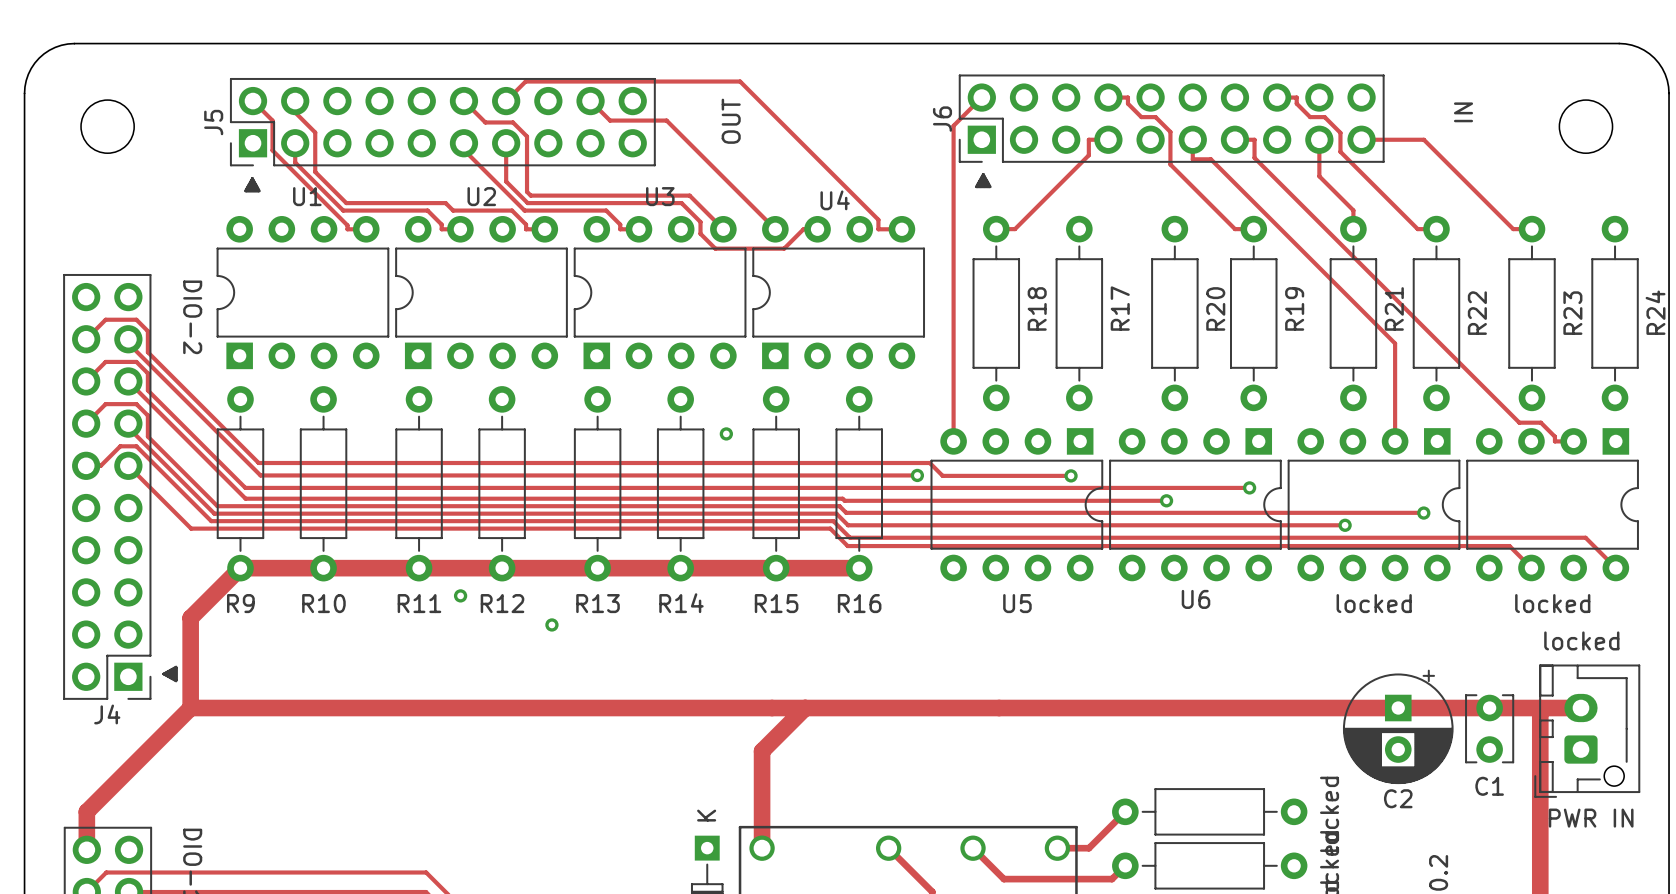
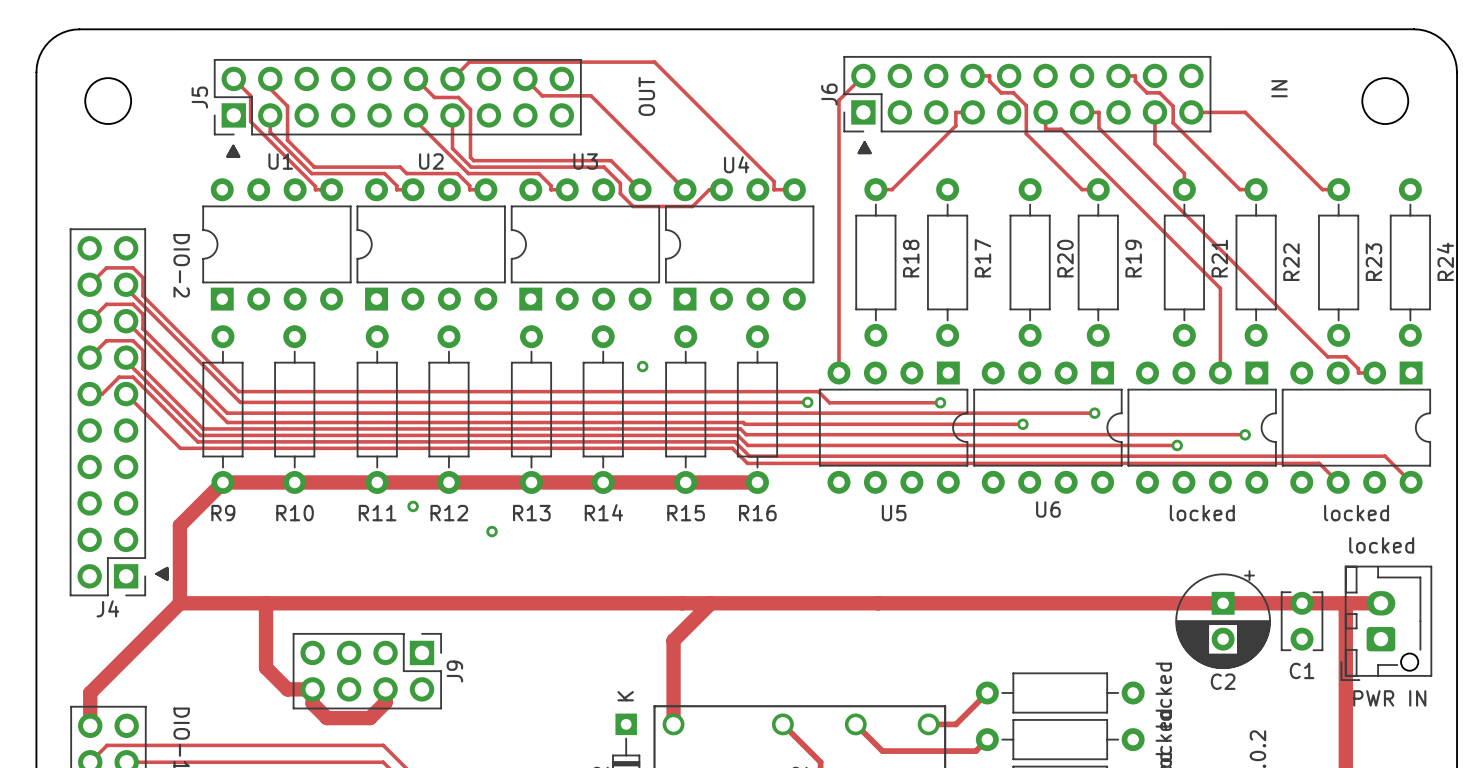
track: none -> (266, 603) (266, 667) (287, 689) (312, 689) (312, 703) (327, 718) (370, 718) (385, 702) (385, 689)
J9: none -> (367, 671)

